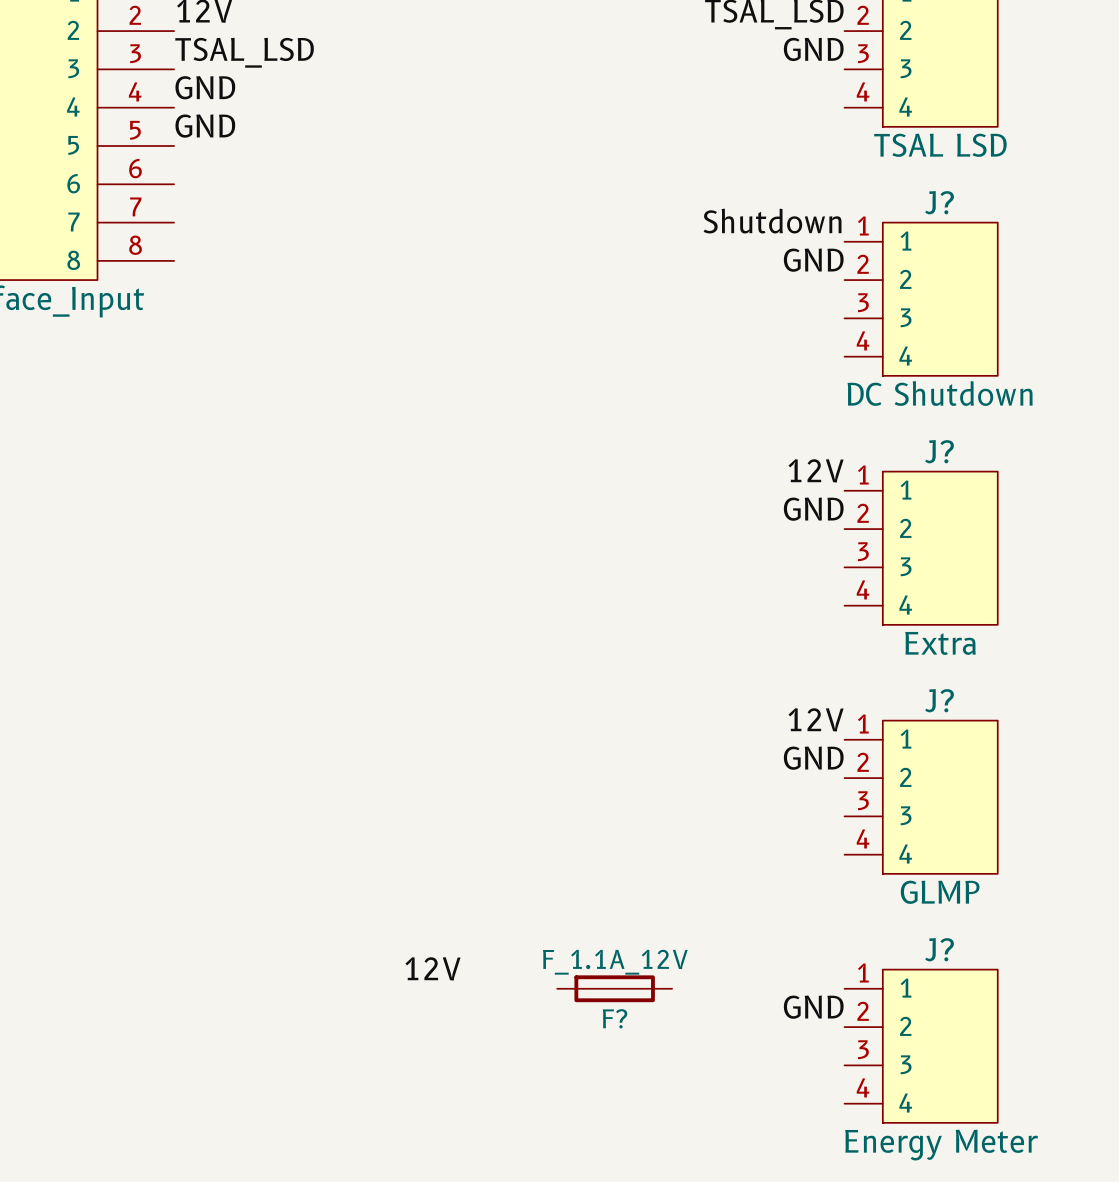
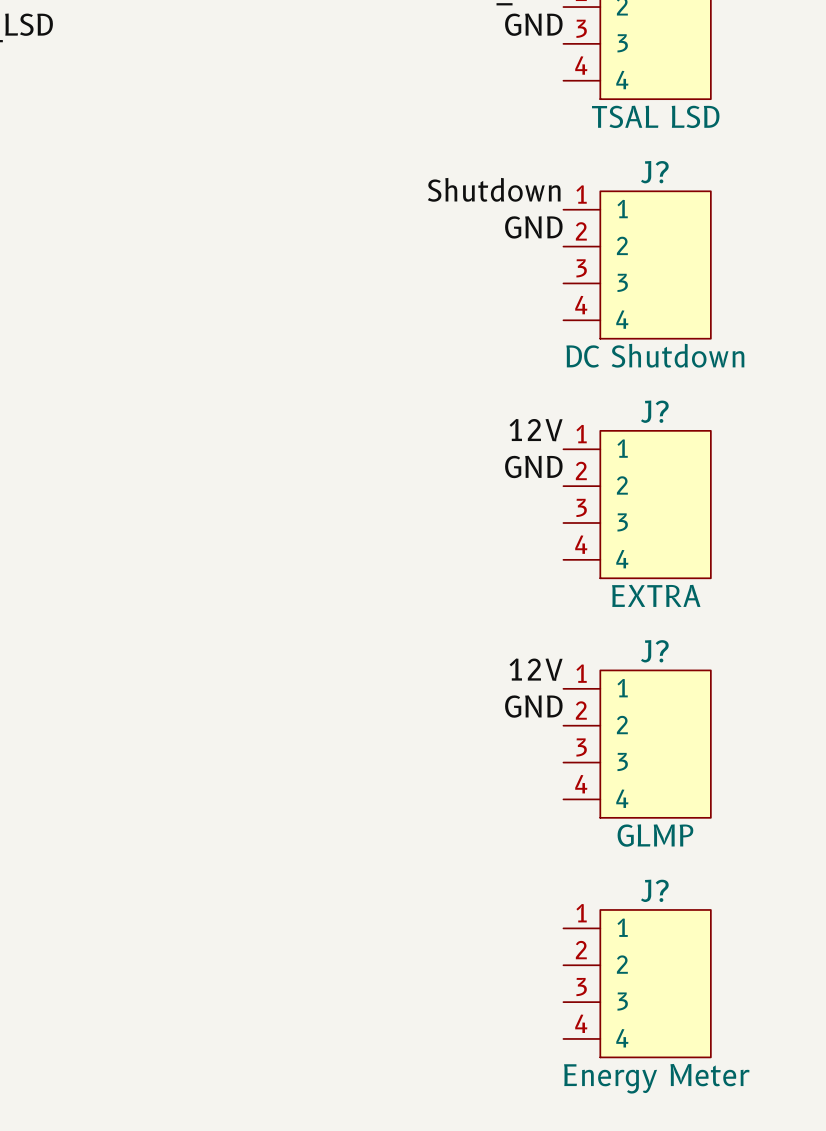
J? value: Extra (940, 643) -> EXTRA (656, 595)
label: 12V (432, 968) -> none
F?: F_1.1A_12V (614, 988) -> none
label: GND (813, 1007) -> none

